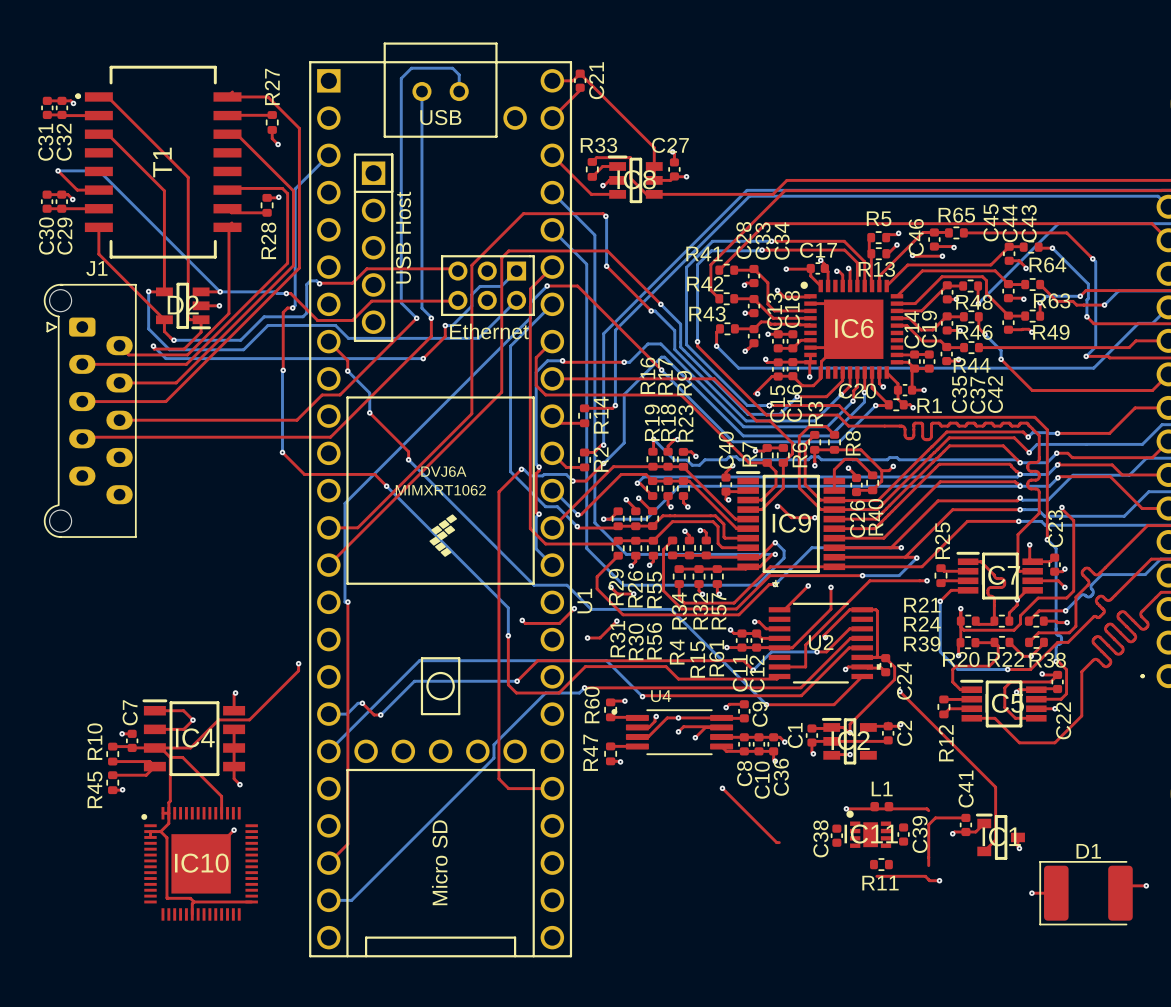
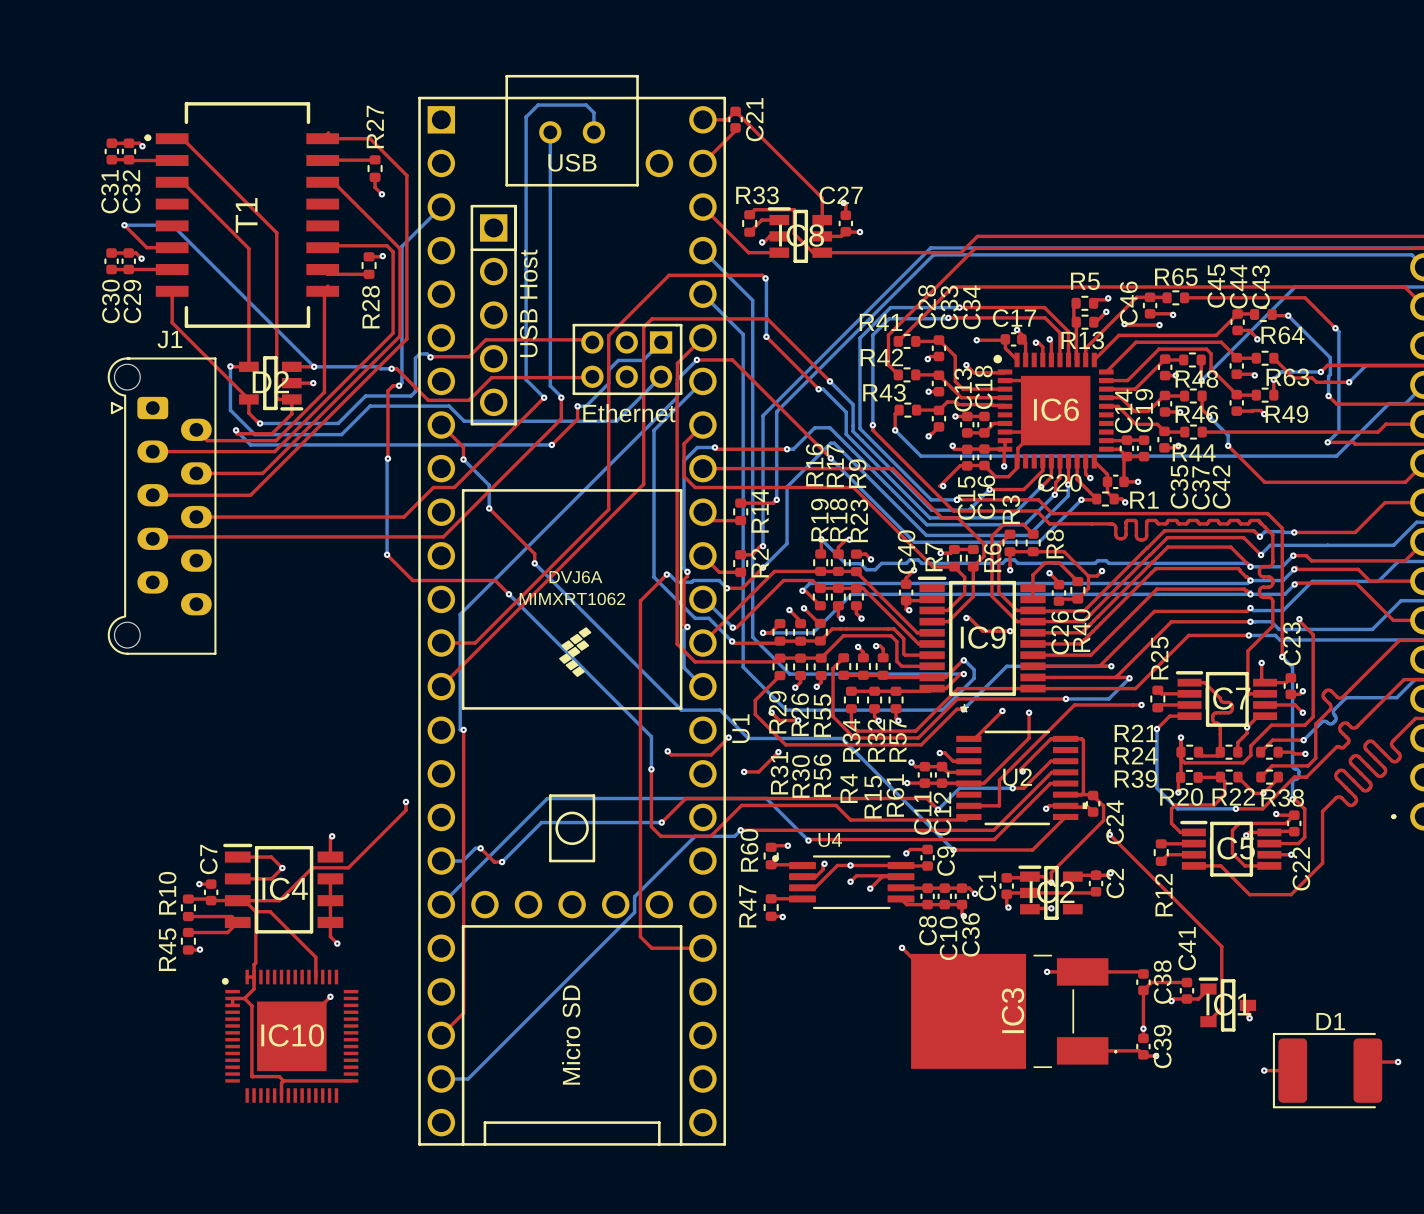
L1: (881, 806) -> none
IC11: (868, 829) -> none
C39 position: (903, 834) -> (1143, 1046)
C38 position: (836, 835) -> (1143, 982)
C38 name position: C38 (820, 838) -> C38 (1162, 982)
IC3: none -> (1014, 1011)
via: none -> (1143, 1028)
R11: (881, 864) -> none

